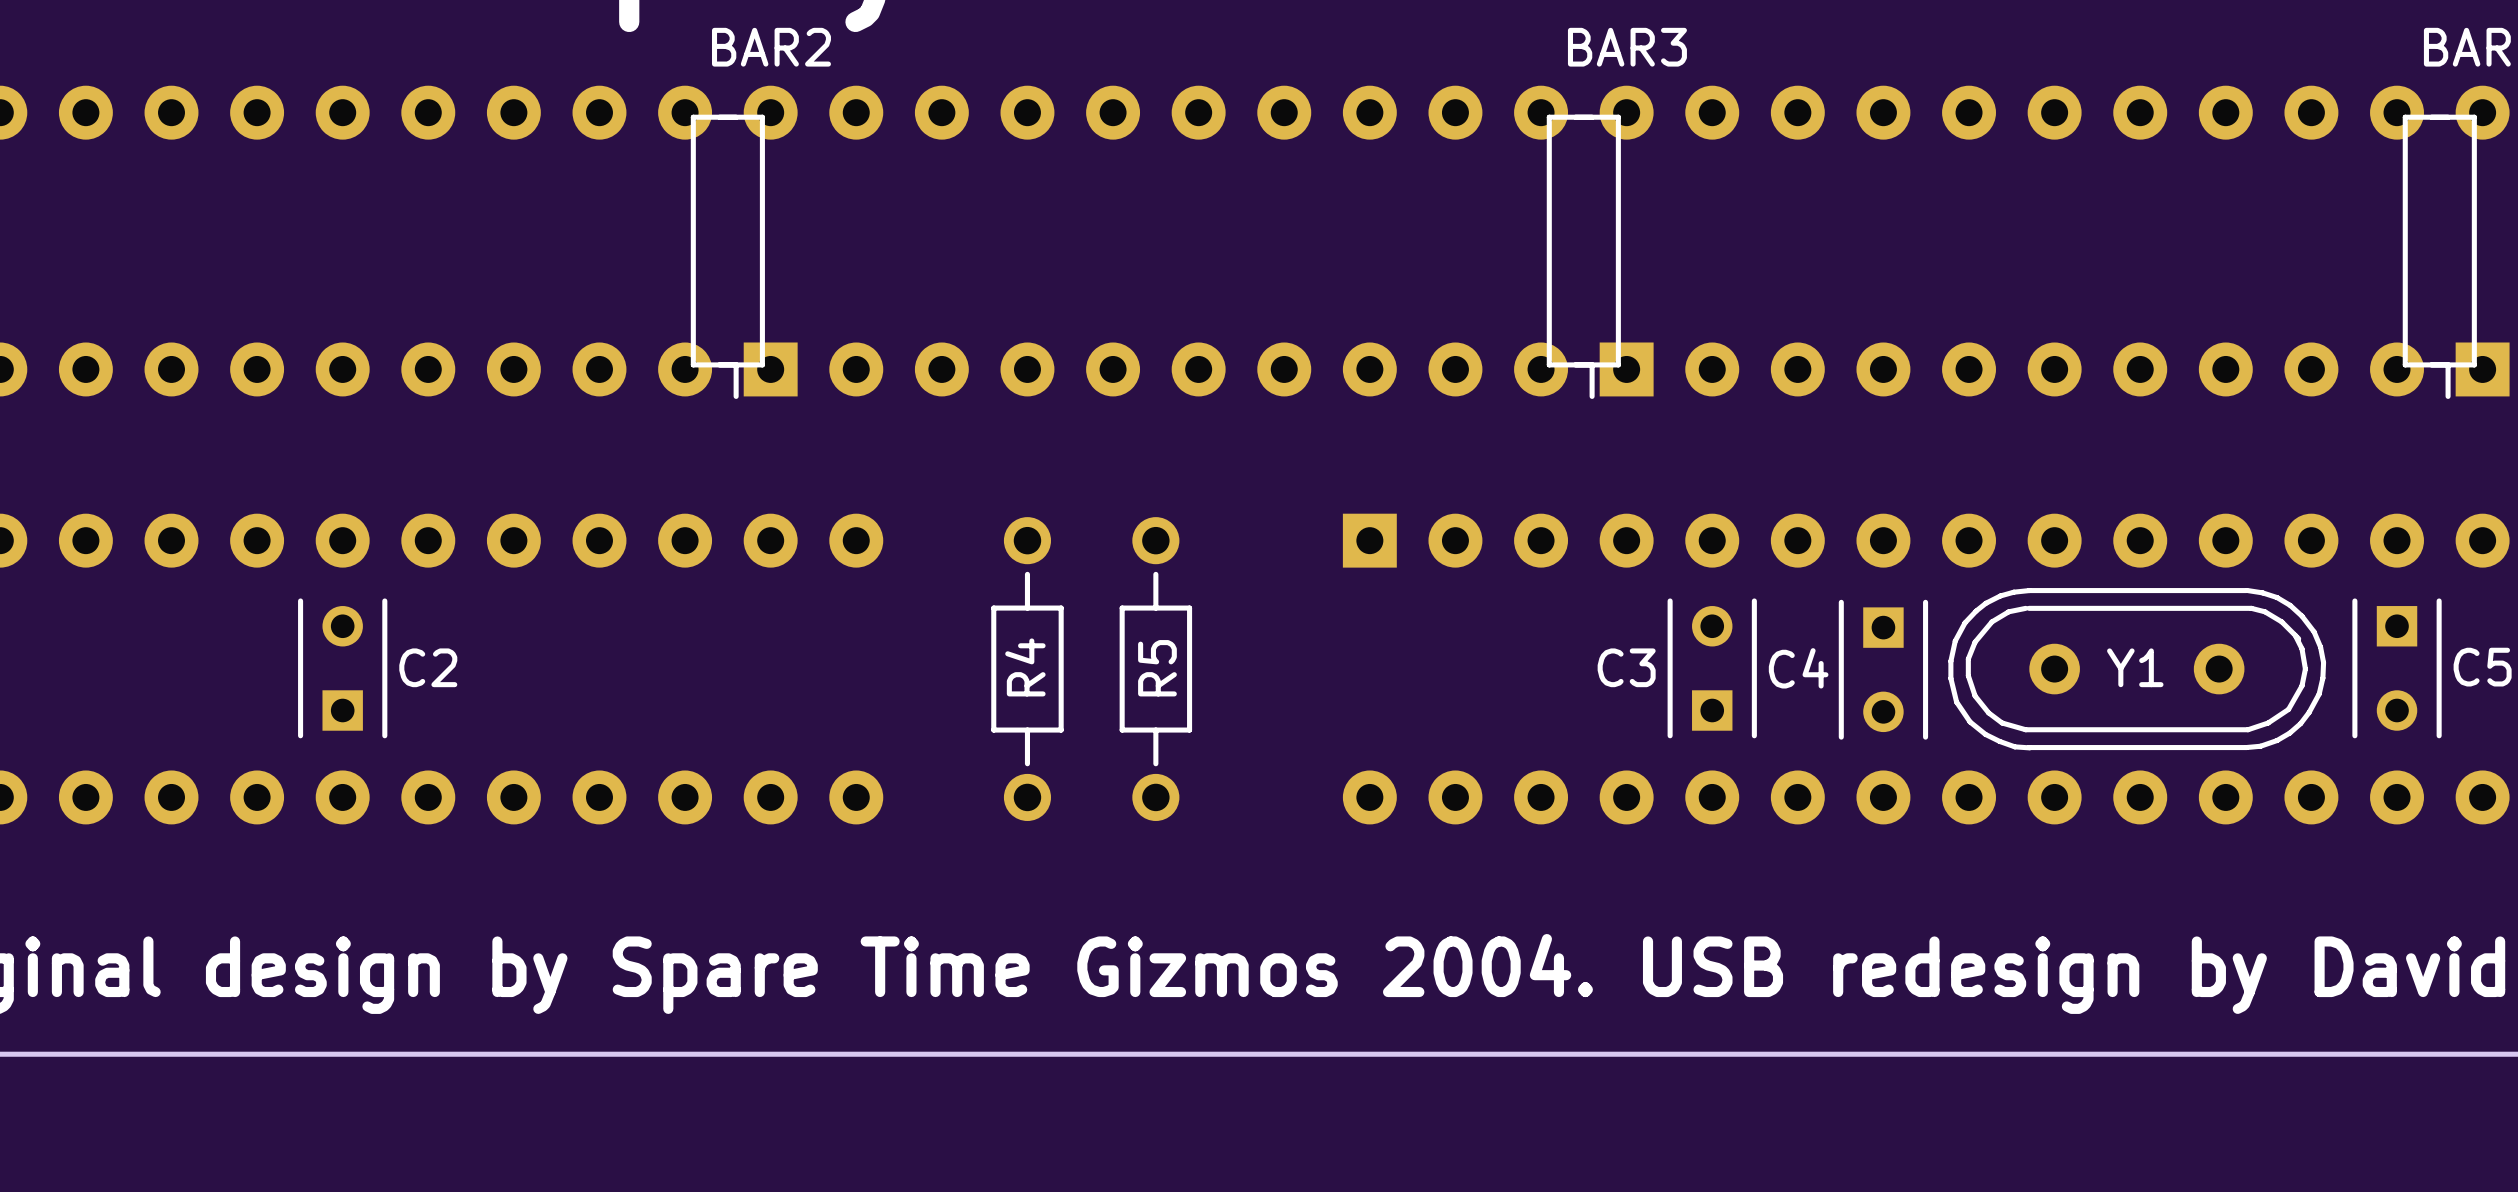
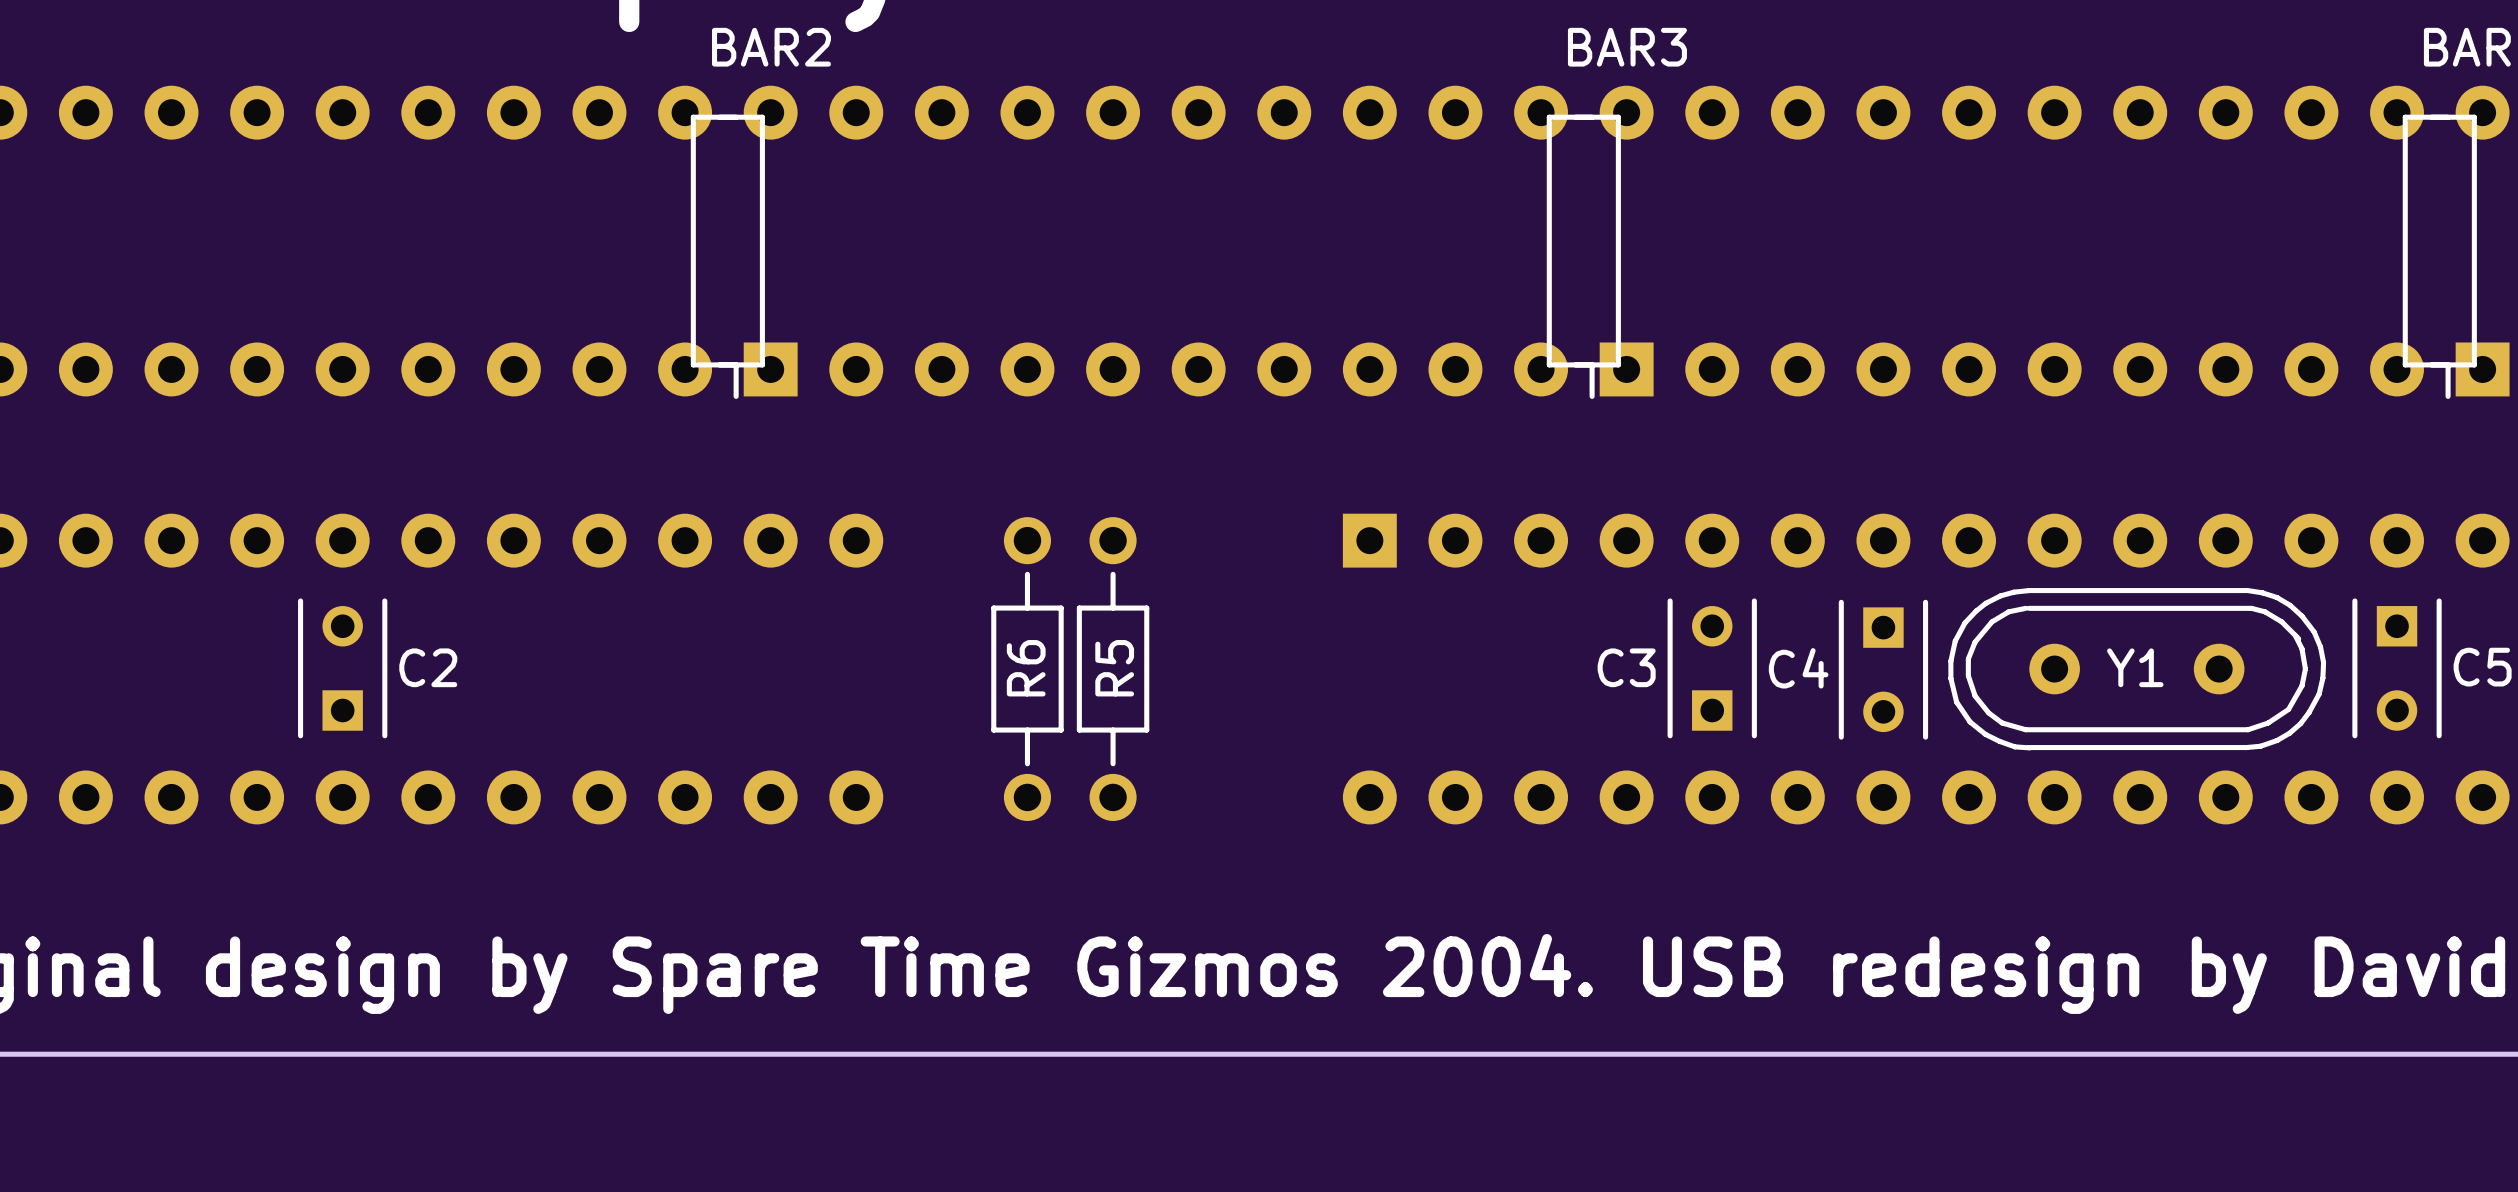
R4 name: R4 (1025, 667) -> R6 (1026, 668)
R5 position: (1155, 669) -> (1113, 669)

